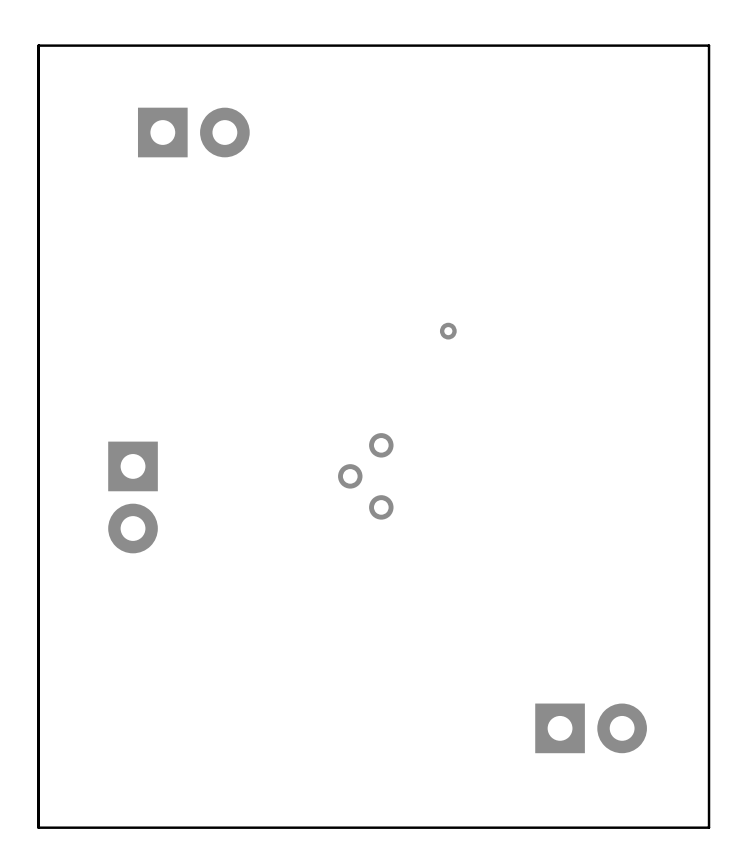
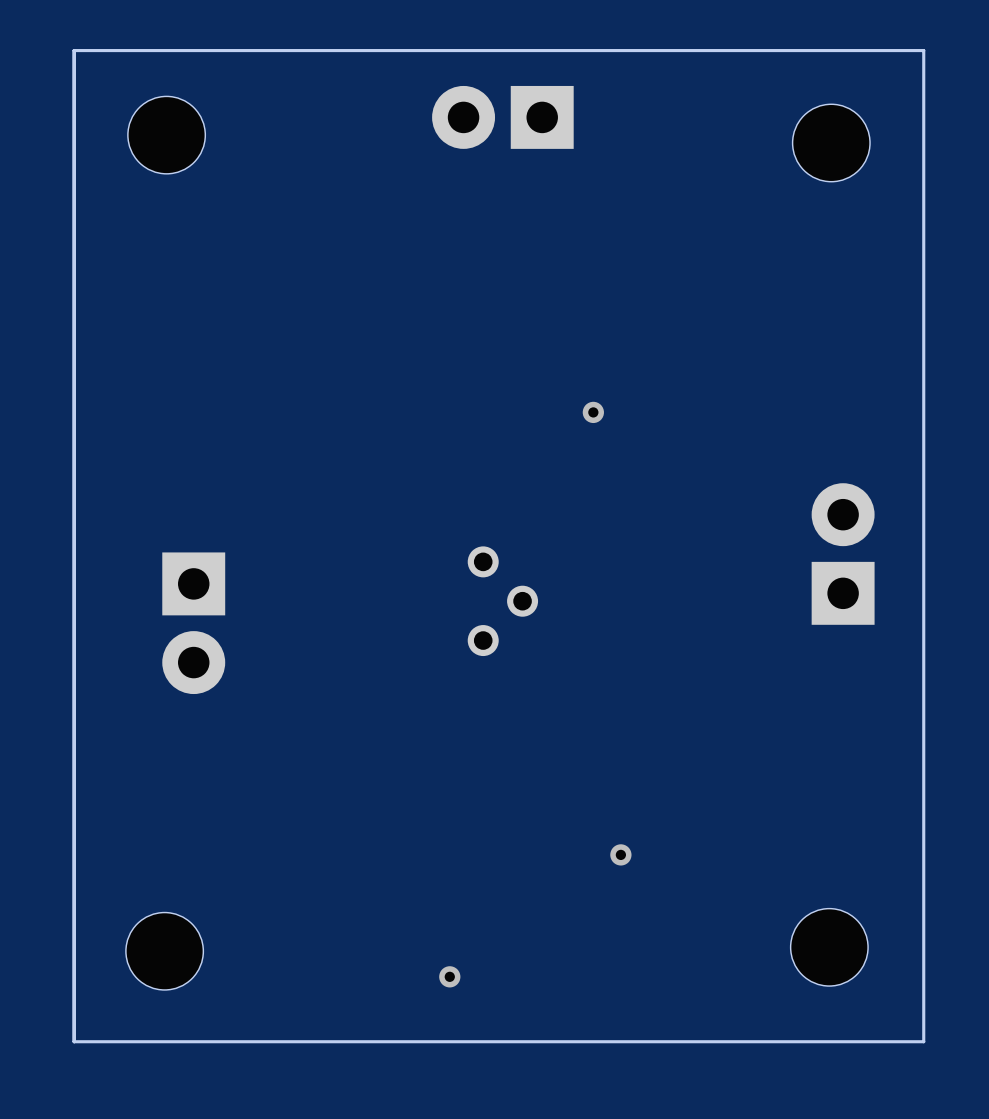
part: none -> (166, 135)
part: none -> (831, 142)
part rotation: 0° (193, 132) -> 180° (502, 117)
part position: (193, 132) -> (502, 117)
part: none -> (843, 554)
part rotation: 0° (365, 476) -> 180° (502, 601)
via: none -> (620, 854)
part: (591, 728) -> none
part: none -> (829, 947)
part: none -> (164, 951)
via: none -> (449, 976)

